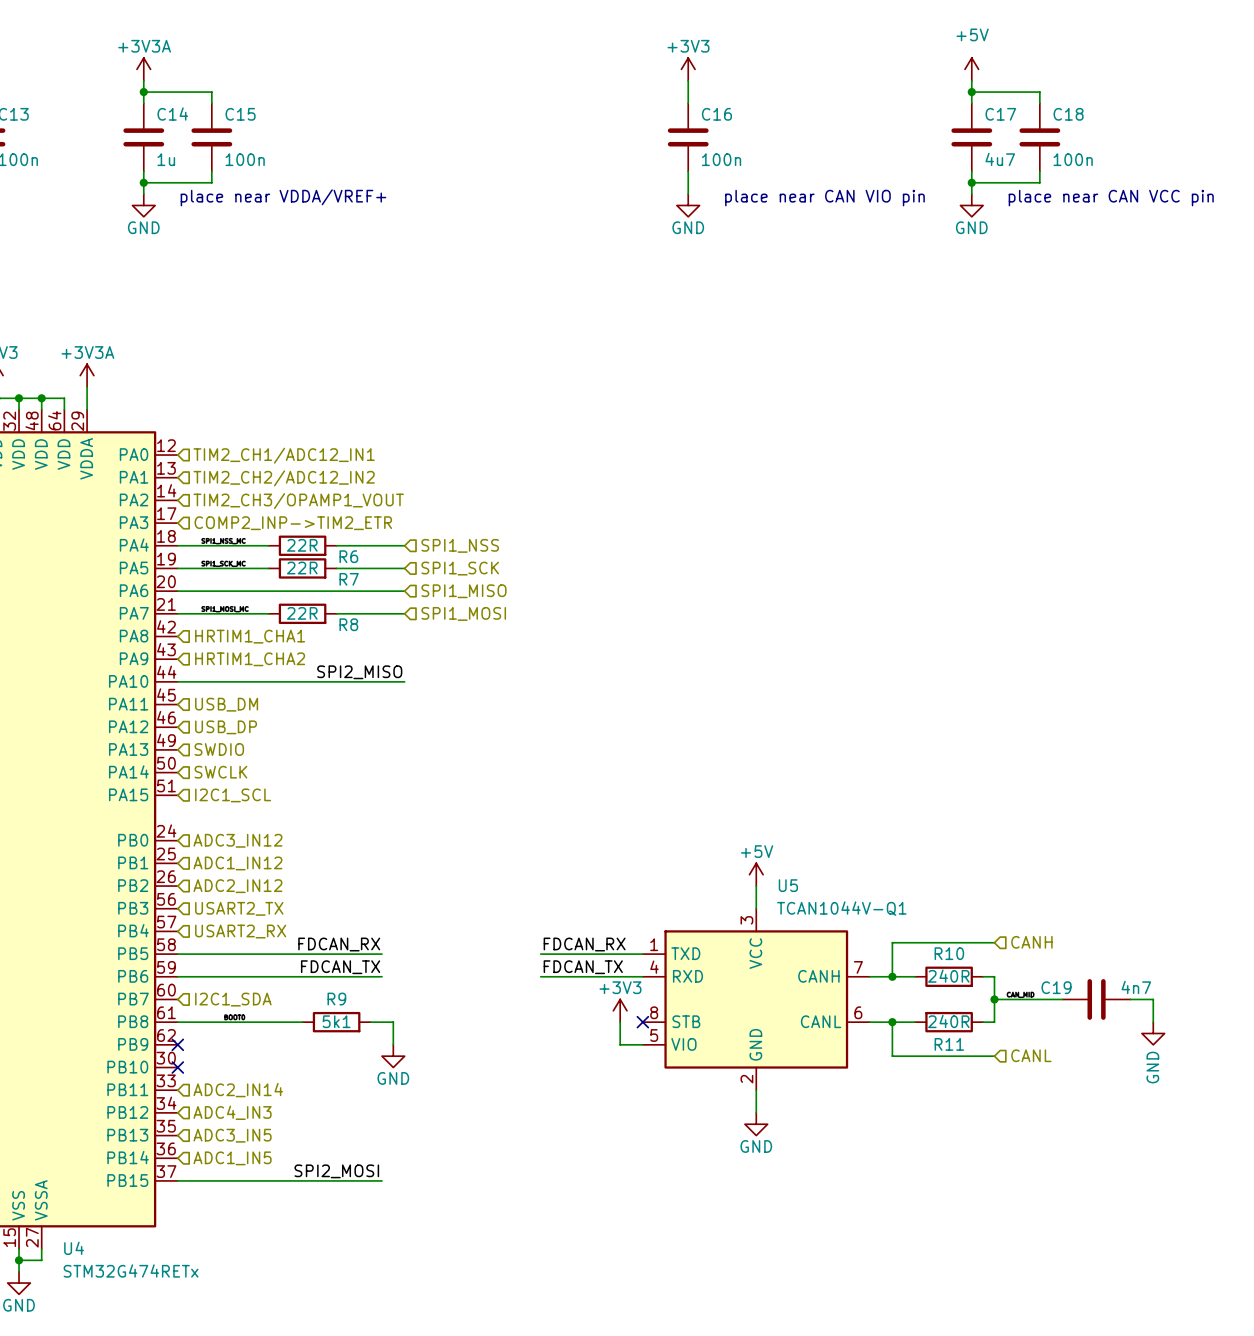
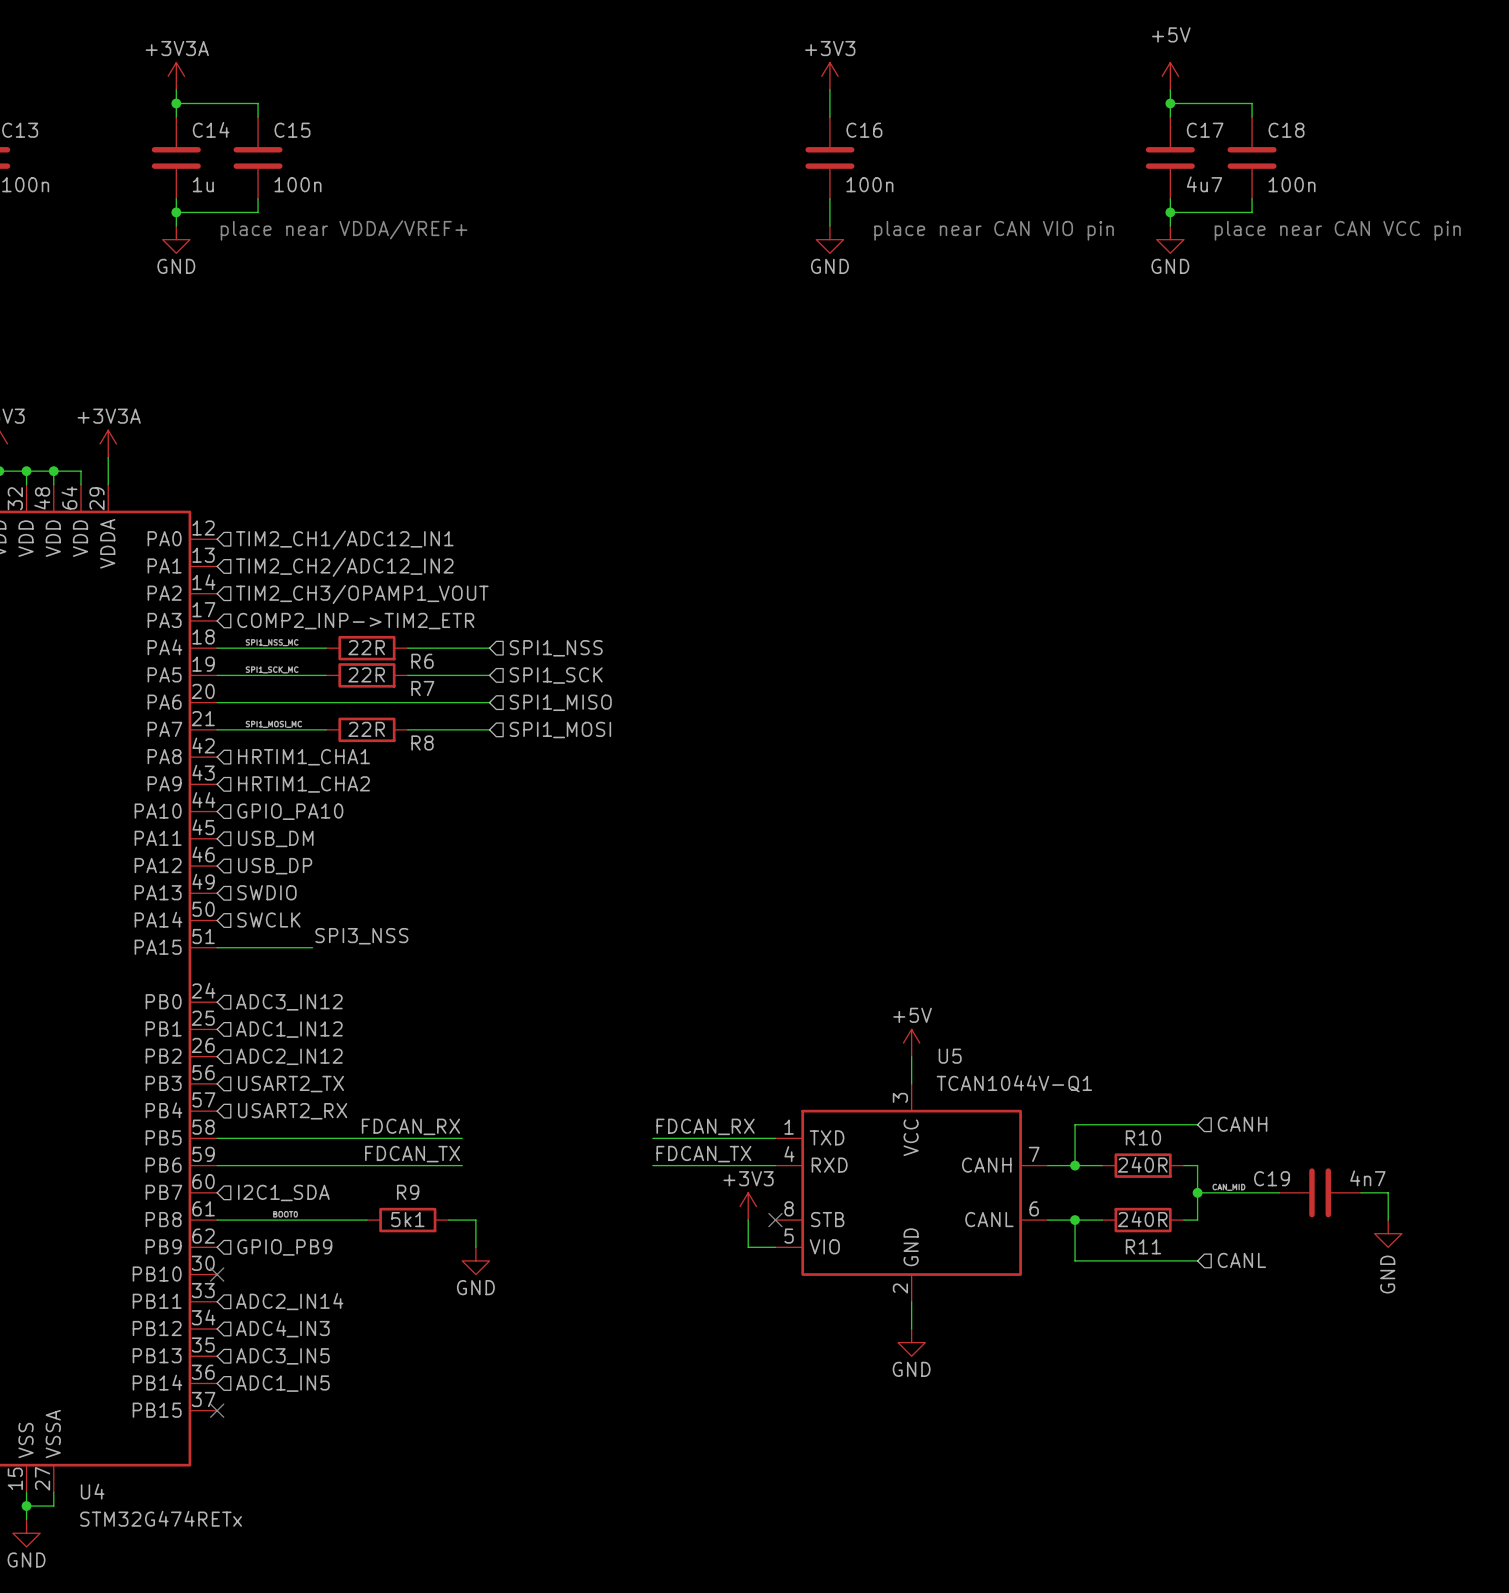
label: SPI2_MISO (359, 672) -> none
wire: (177, 681) (404, 681) -> none
hierarchical label: none -> GPIO_PA10 (290, 811)
label: none -> SPI3_NSS (361, 936)
wire: none -> (217, 947) (312, 947)
hierarchical label: I2C1_SCL (233, 795) -> none
no-connect mark: (177, 1044) -> none
hierarchical label: none -> GPIO_PB9 (284, 1247)
label: SPI2_MOSI (336, 1171) -> none
wire: (177, 1180) (381, 1180) -> none
no-connect mark: none -> (217, 1410)

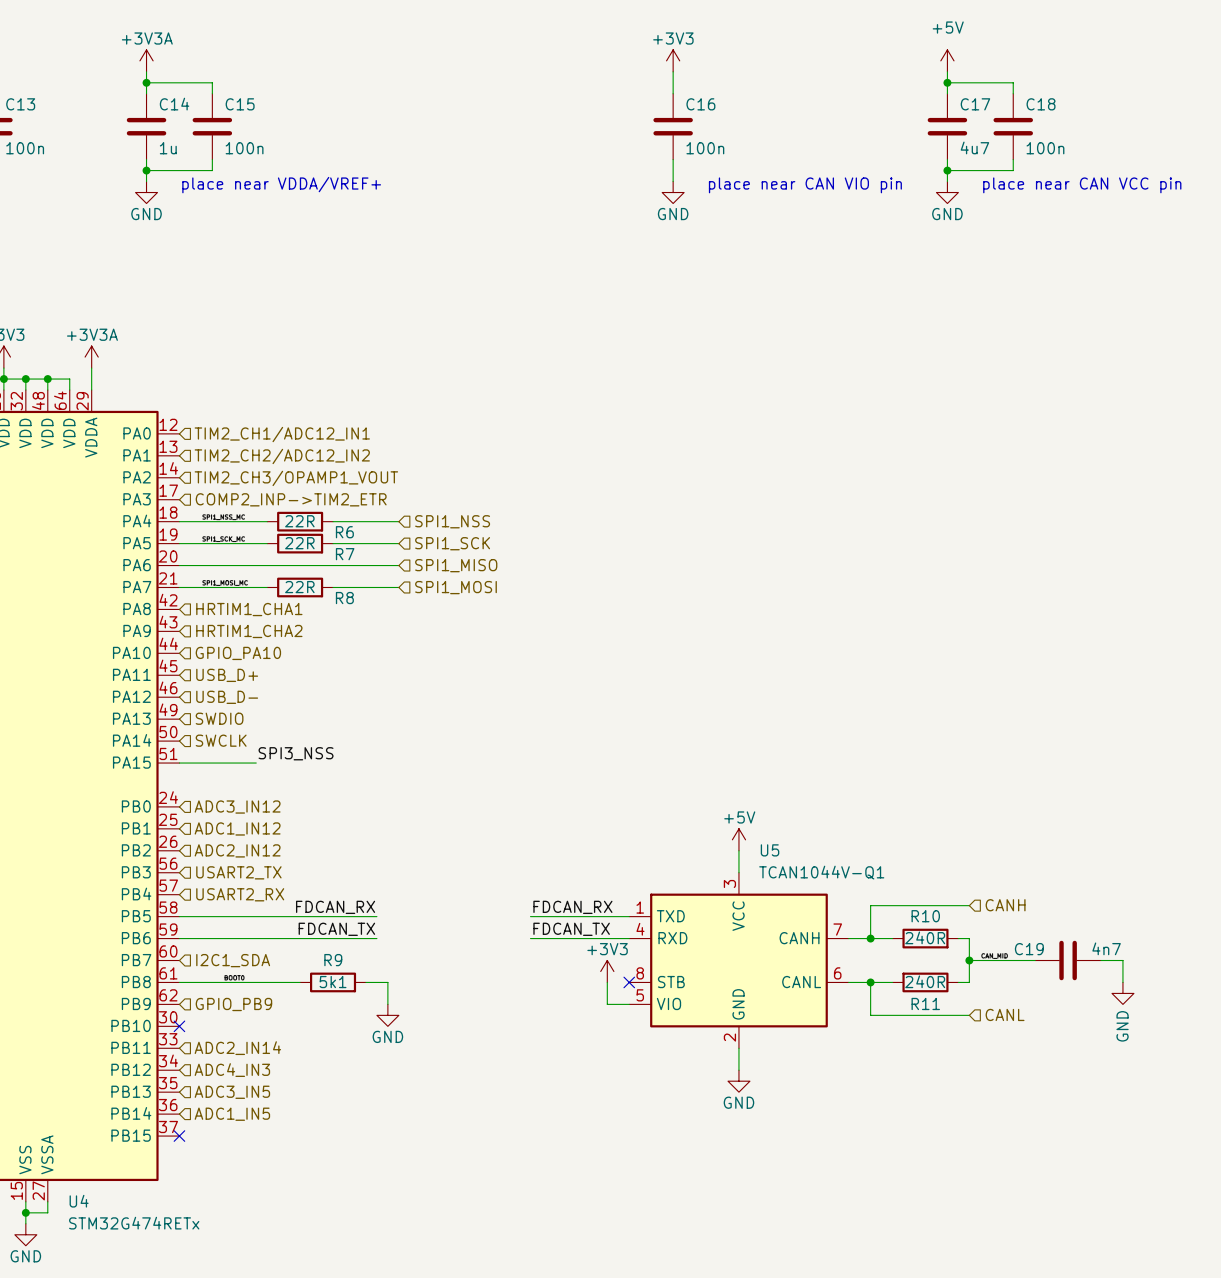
hierarchical label: USB_DM (275, 838) -> USB_D+ (227, 675)
hierarchical label: USB_DP (275, 866) -> USB_D- (227, 697)

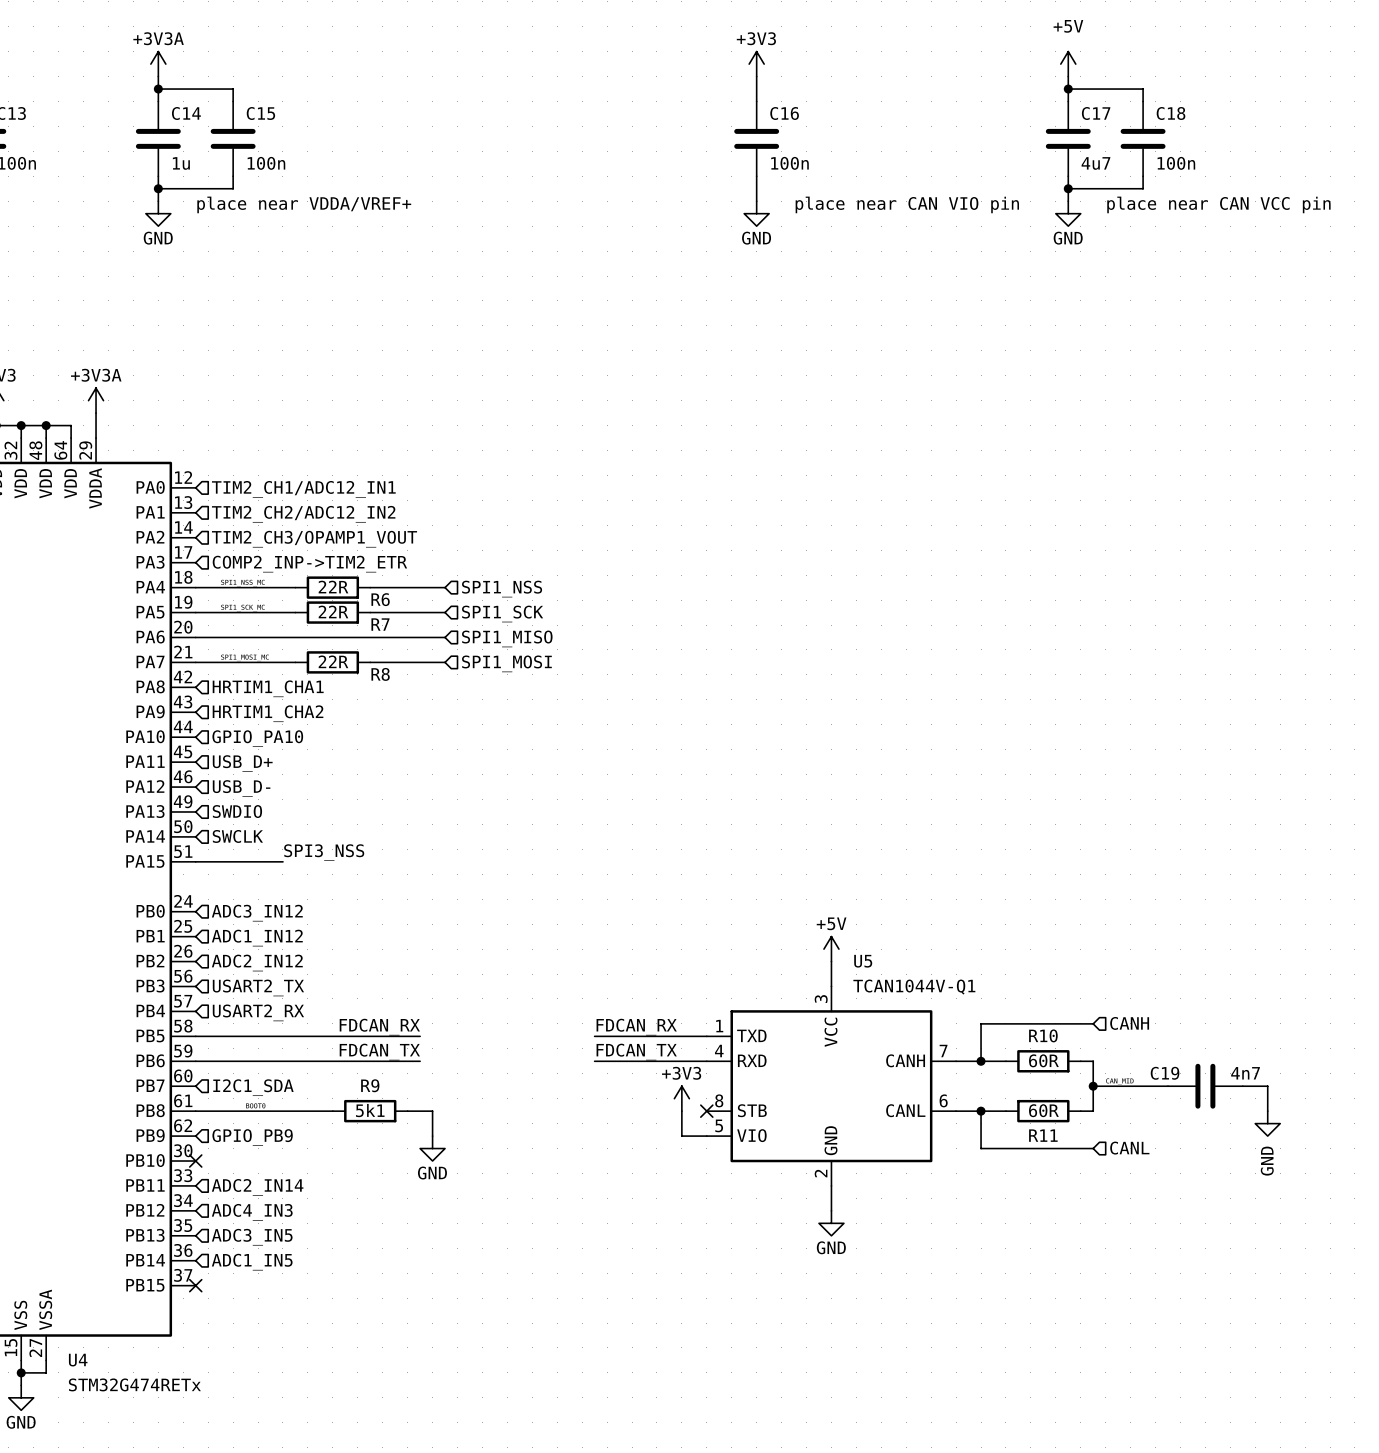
R10 value: 240R (925, 937) -> 60R (1043, 1060)
R11 value: 240R (925, 981) -> 60R (1043, 1110)

